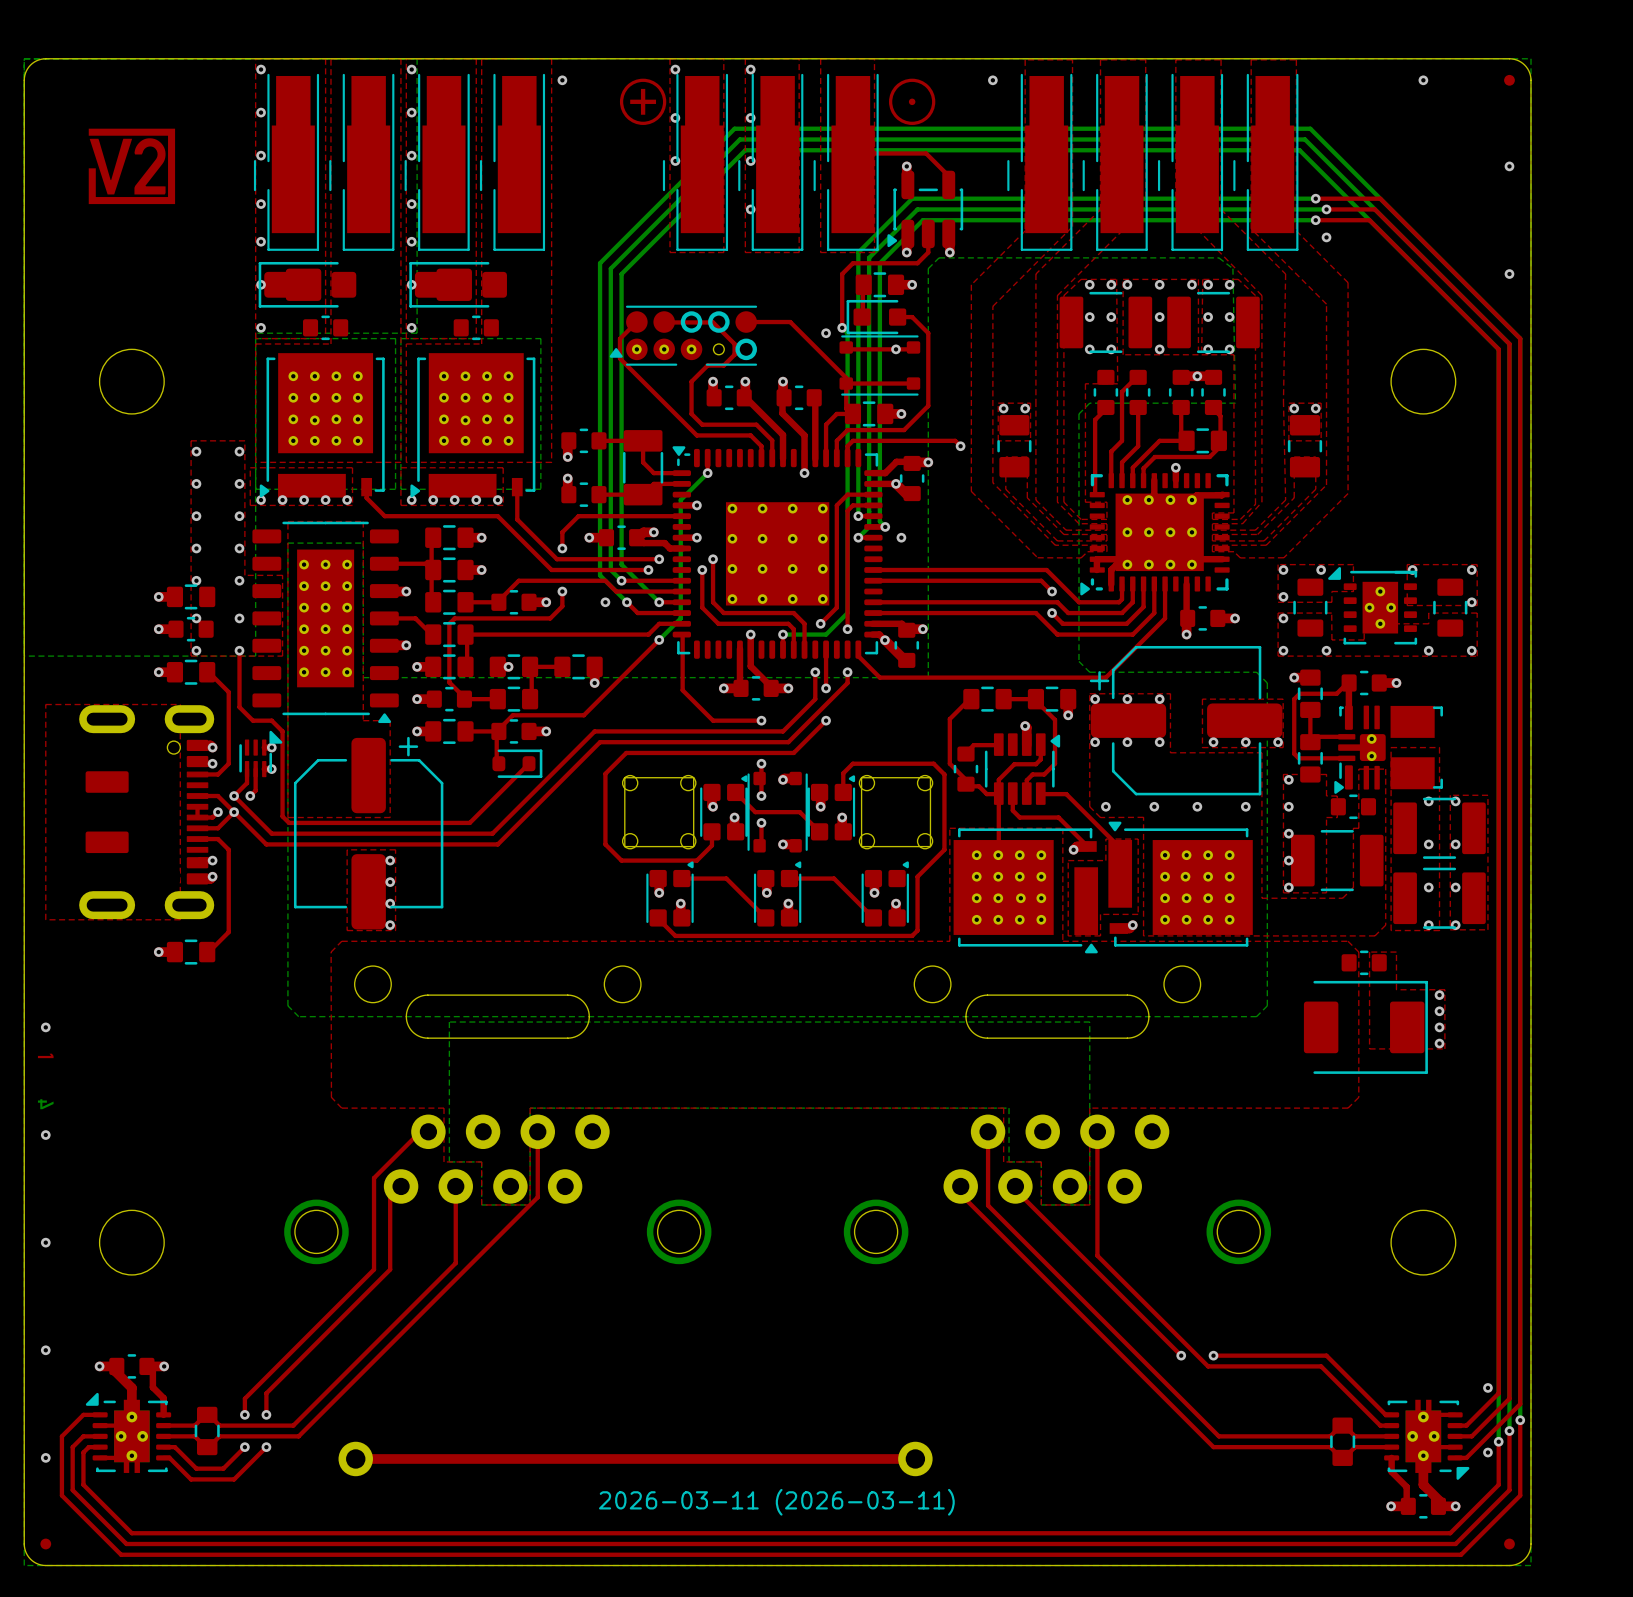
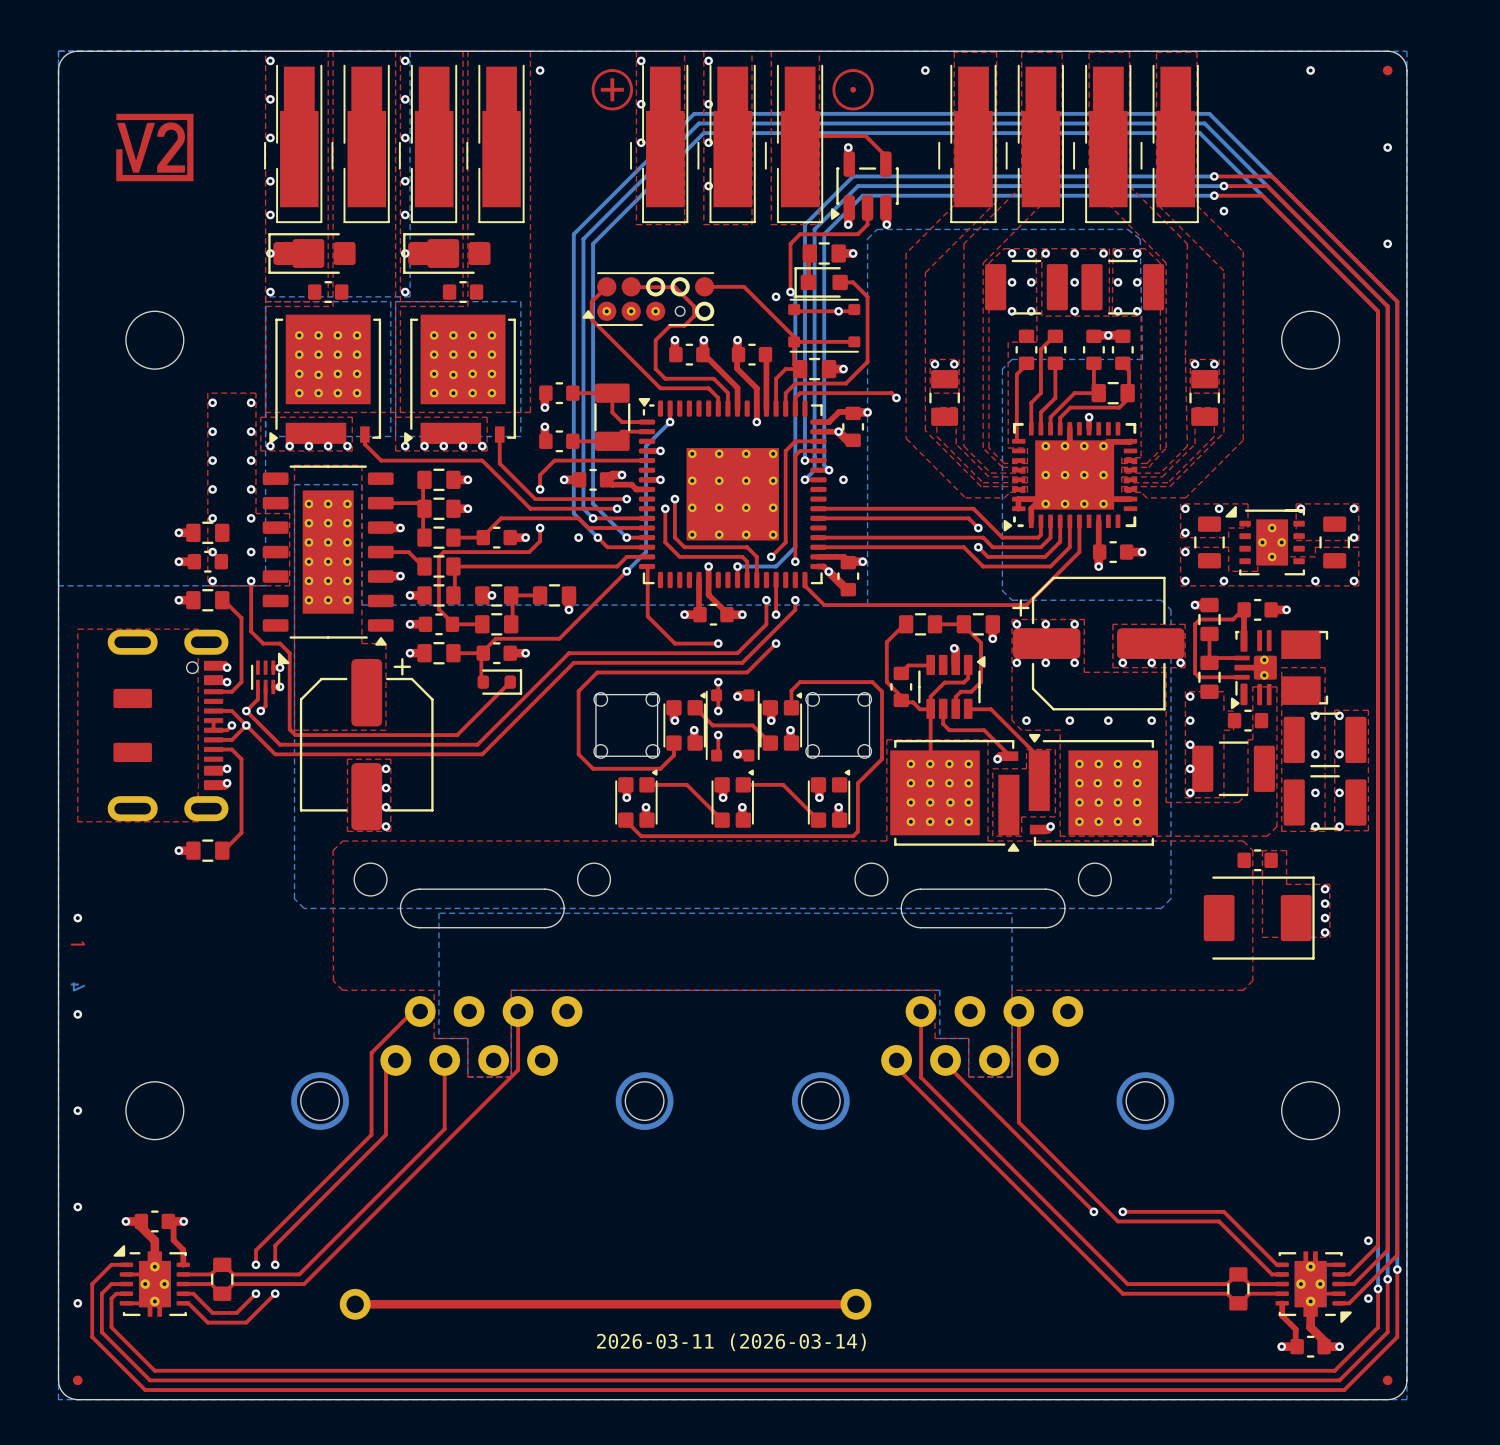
drawing shape: [598, 1488, 955, 1516] -> [597, 1333, 866, 1352]

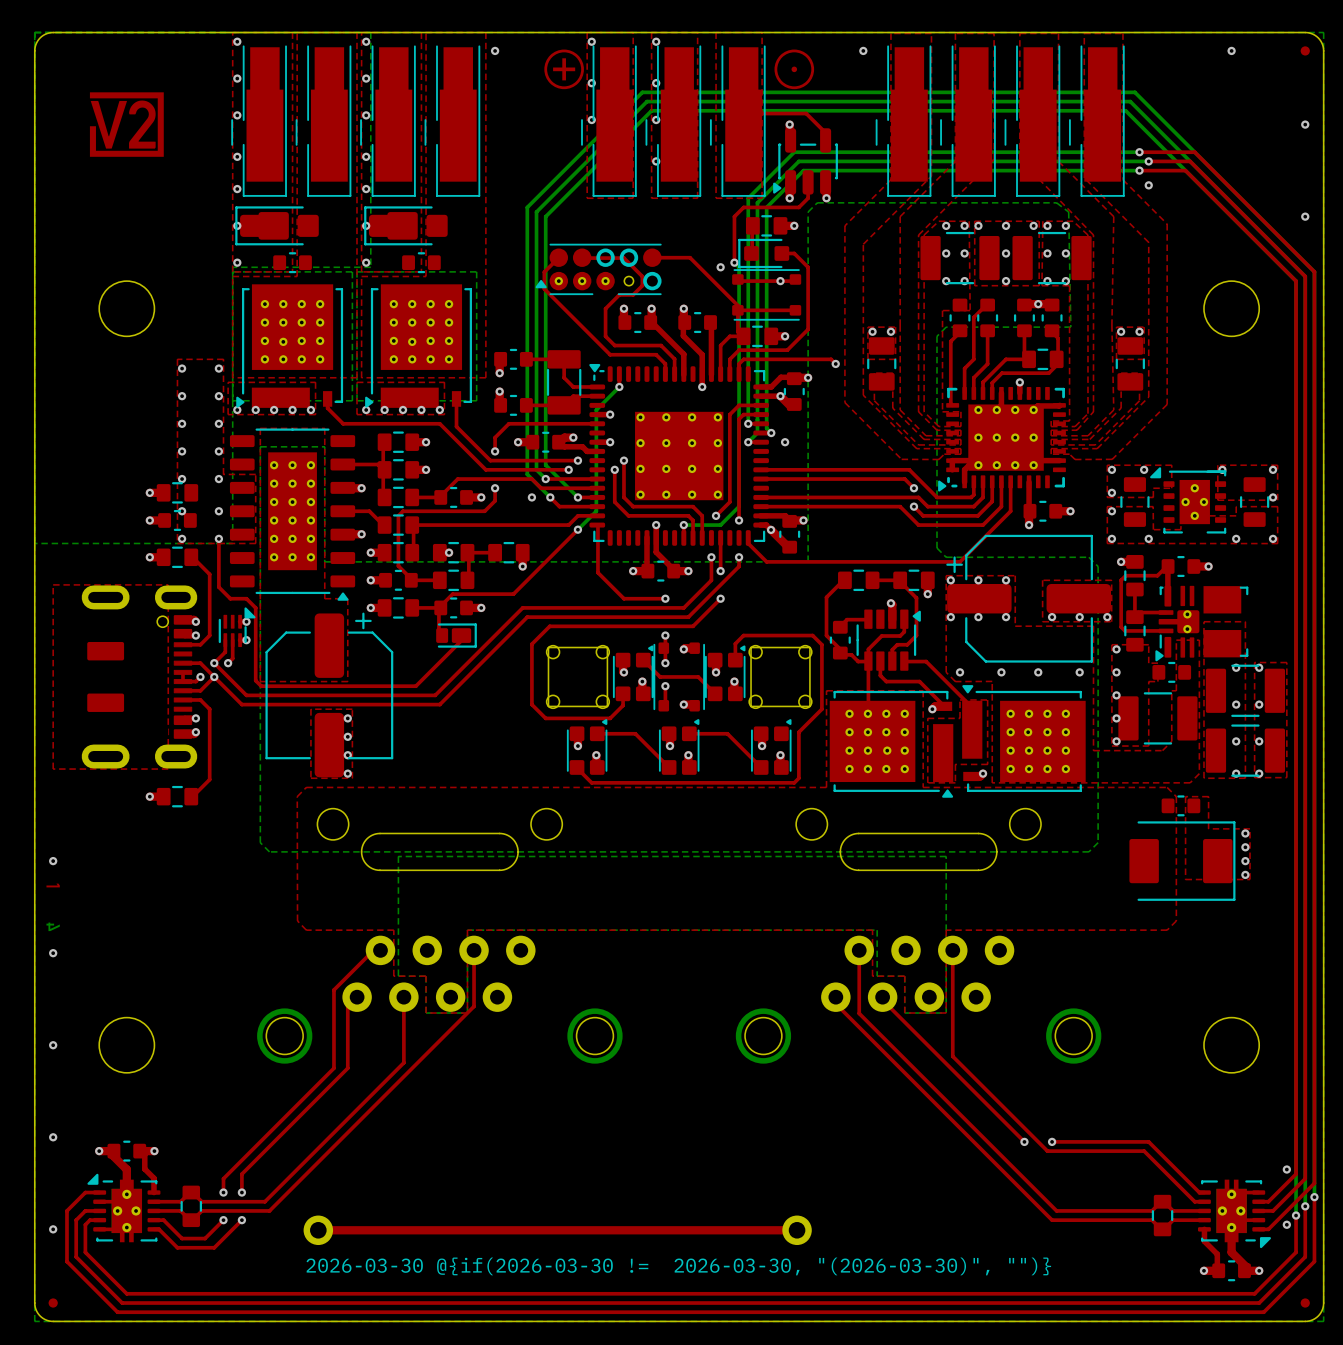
part footprint: [477, 669, 523, 695] -> [436, 623, 477, 648]
drawing shape: [597, 1333, 866, 1352] -> [306, 1257, 1052, 1276]

